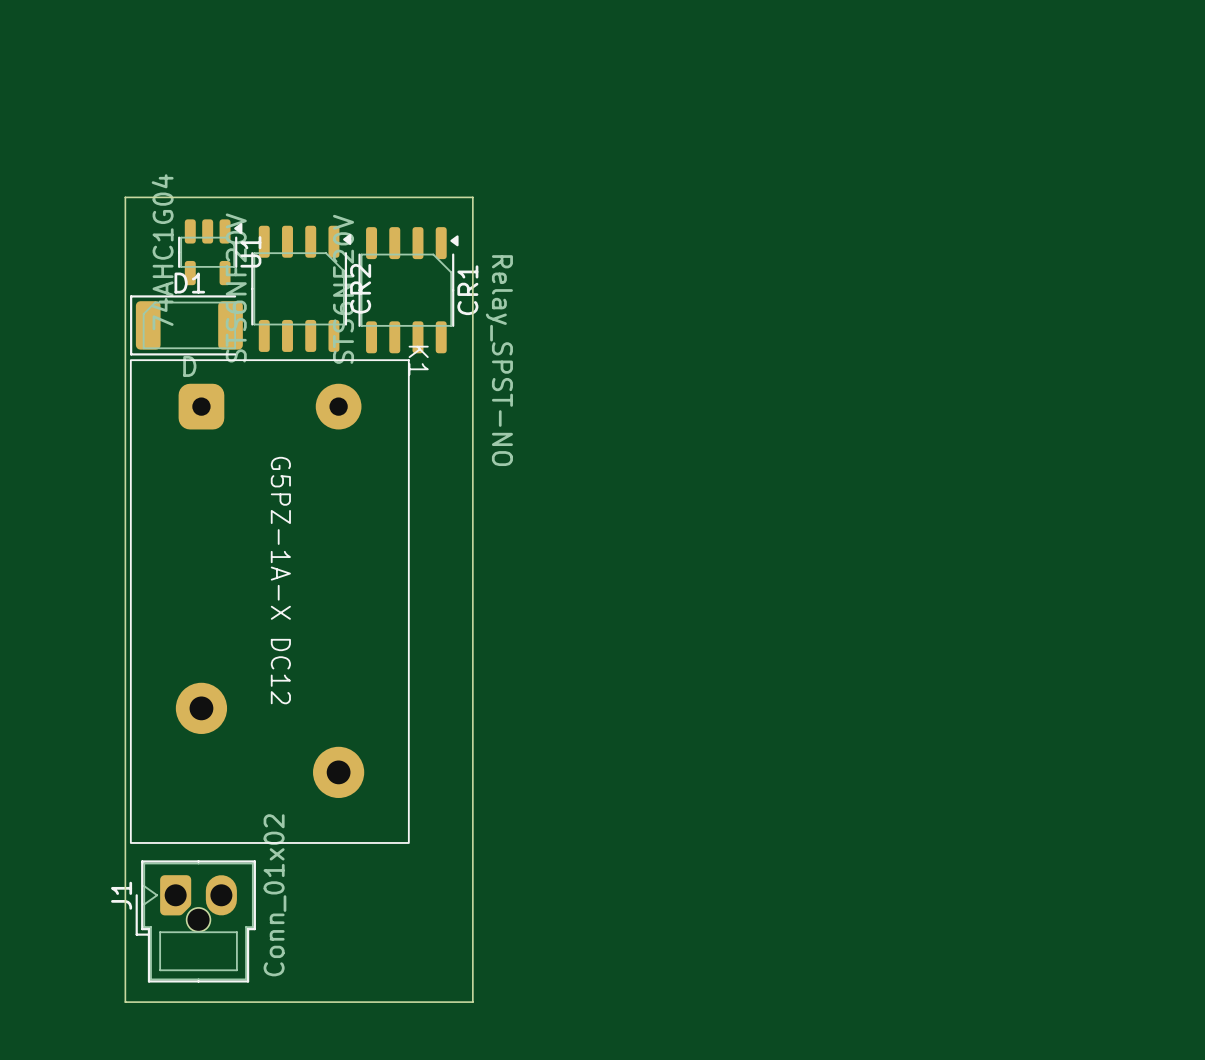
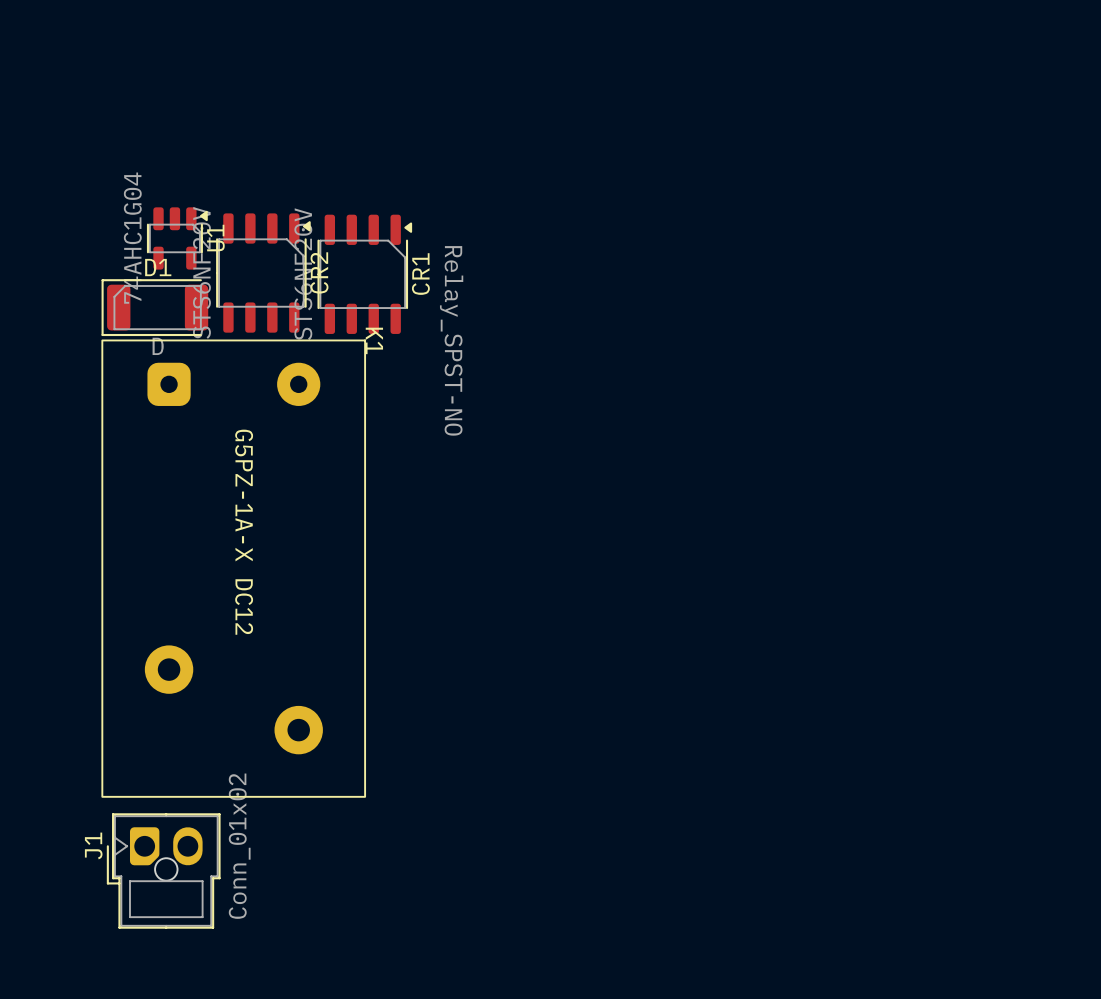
board edge: (125, 197) (472, 197) (472, 1002) (125, 1002) (125, 197) -> none

